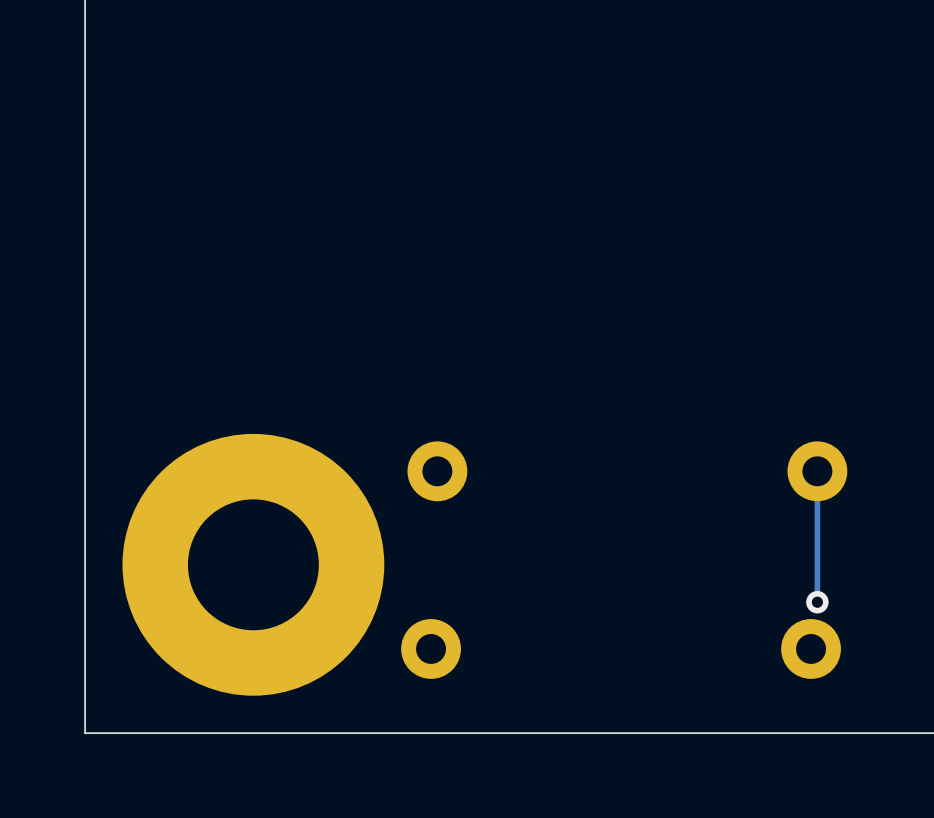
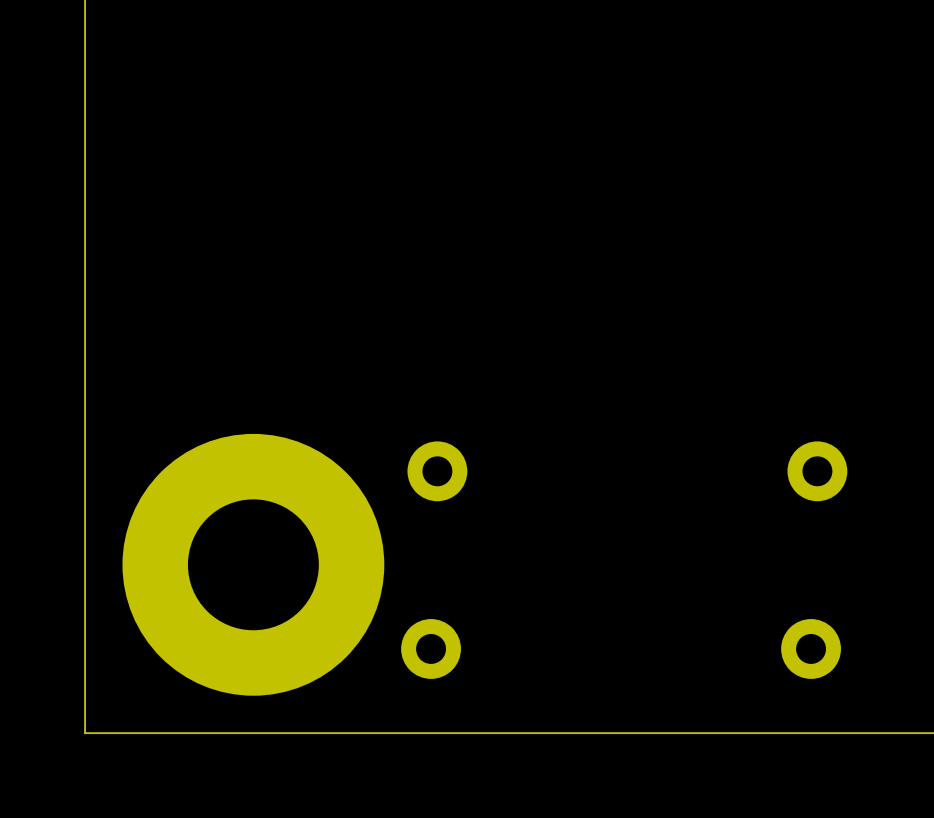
track: (817, 471) (817, 602) -> none
via: (817, 602) -> none

